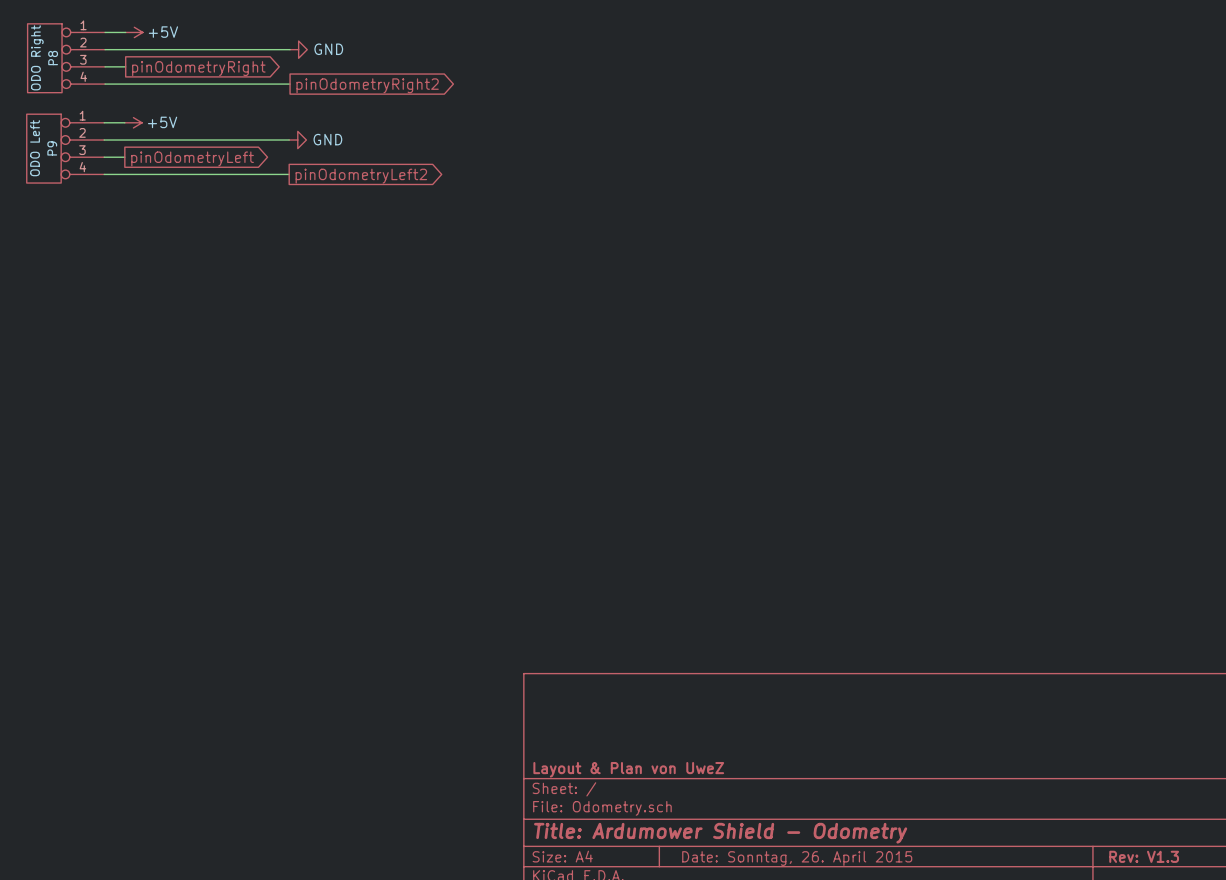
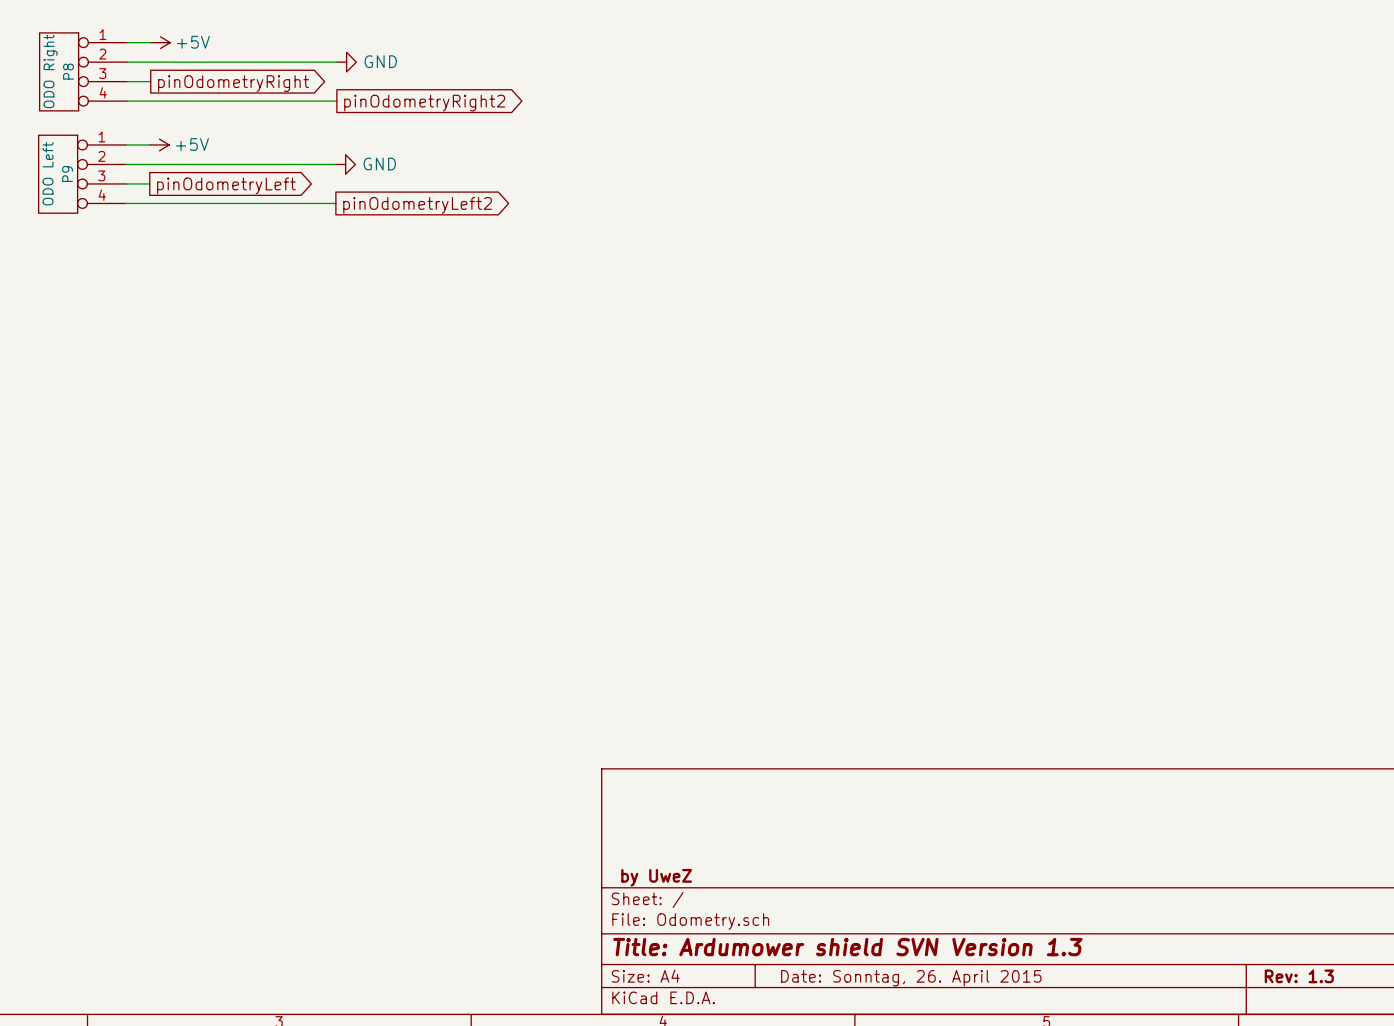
title block: Layout & Plan von UweZ (628, 769) -> by UweZ (656, 877)
title block: Title: Ardumower Shield - Odometry (720, 833) -> Title: Ardumower shield SVN Version 1.3 (847, 947)
title block: Rev: V1.3 (1144, 856) -> Rev: 1.3 (1299, 976)

